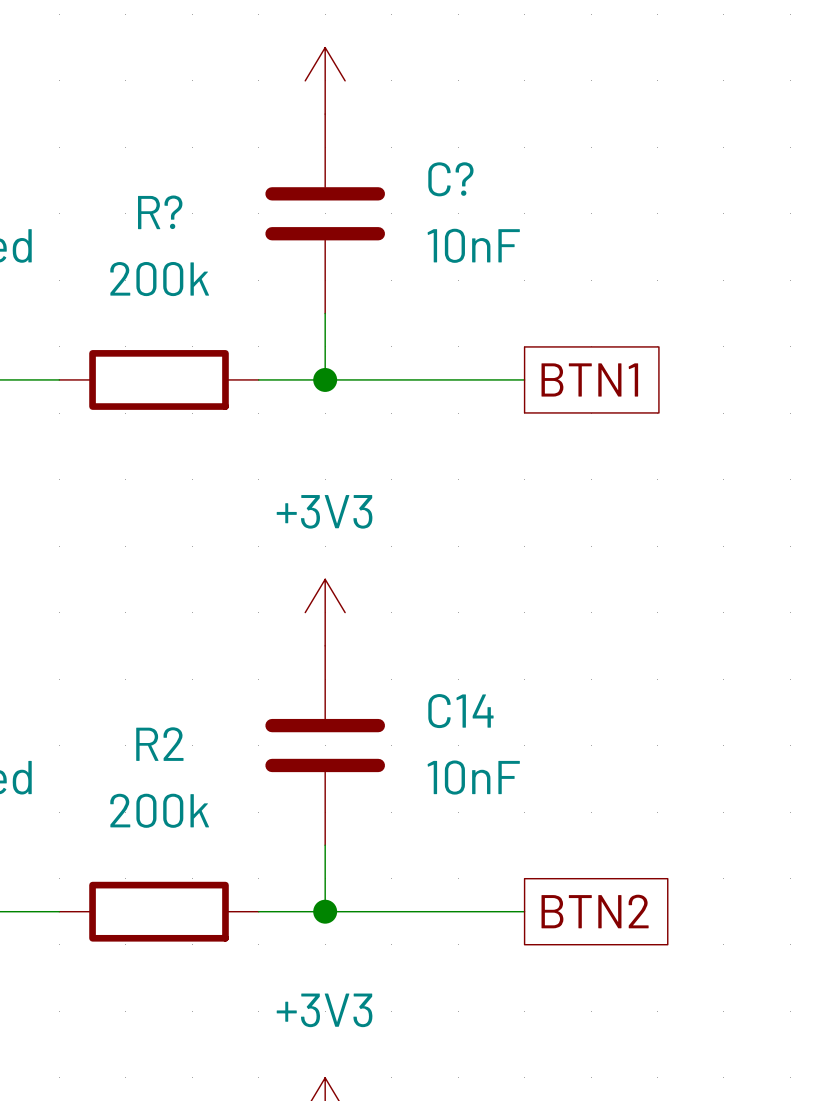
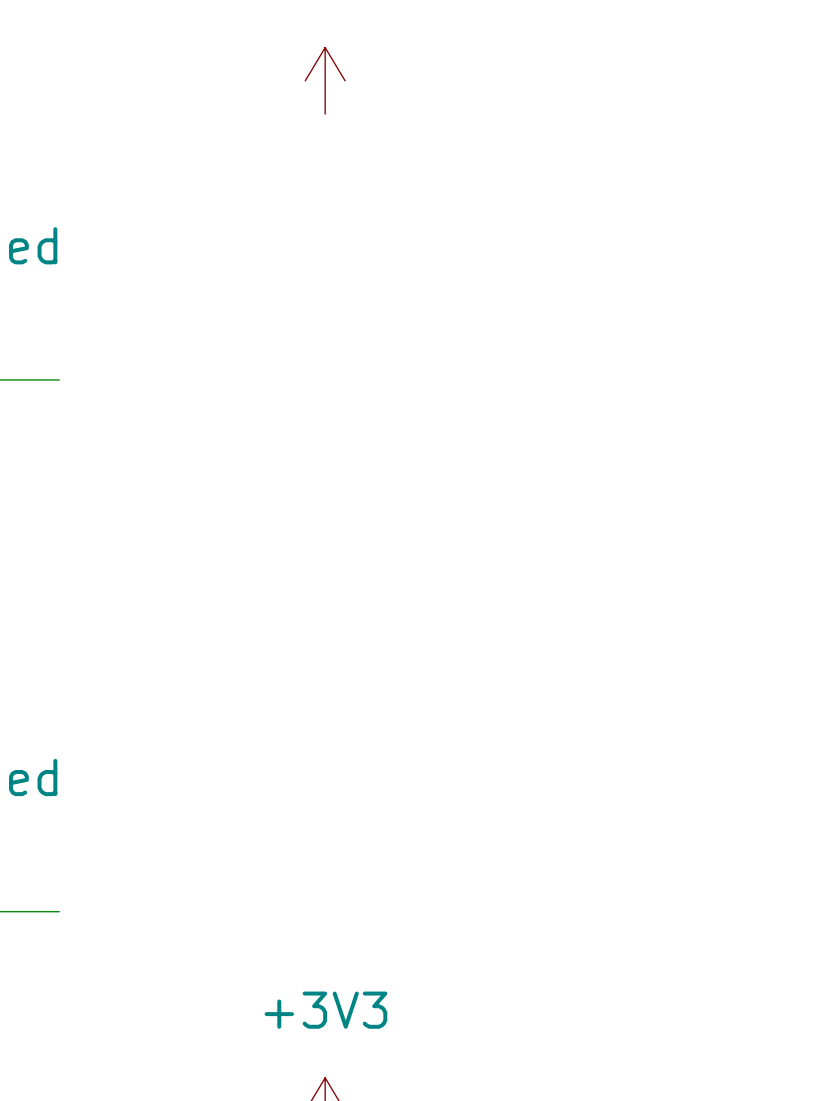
C?: 10nF (325, 213) -> none
wire: (325, 313) (325, 379) -> none
R?: 200k (159, 379) -> none
wire: (258, 379) (524, 379) -> none
junction: (325, 379) -> none
global label: BTN1 (589, 379) -> none
power symbol: +3V3 (325, 612) -> none
C14: 10nF (325, 745) -> none
wire: (325, 845) (325, 911) -> none
R2: 200k (159, 911) -> none
wire: (258, 911) (524, 911) -> none
junction: (325, 911) -> none
global label: BTN2 (595, 911) -> none

